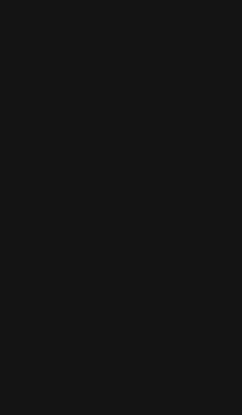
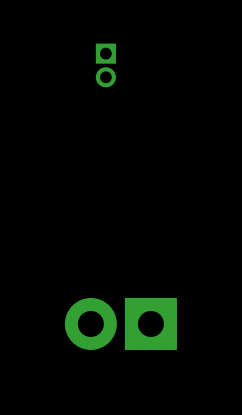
part: none -> (105, 65)
part: none -> (120, 323)

